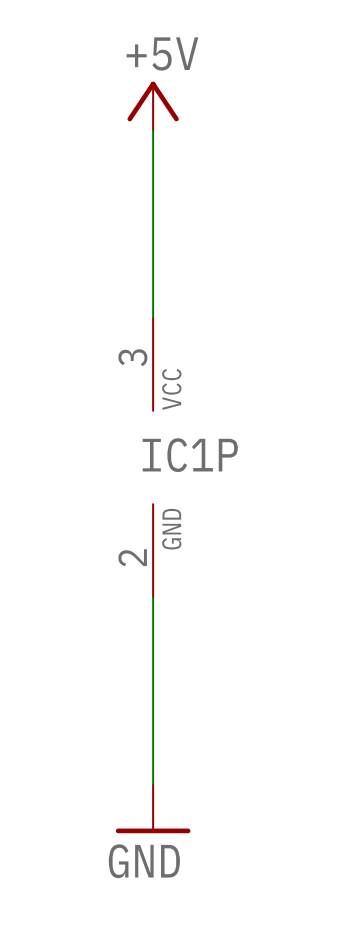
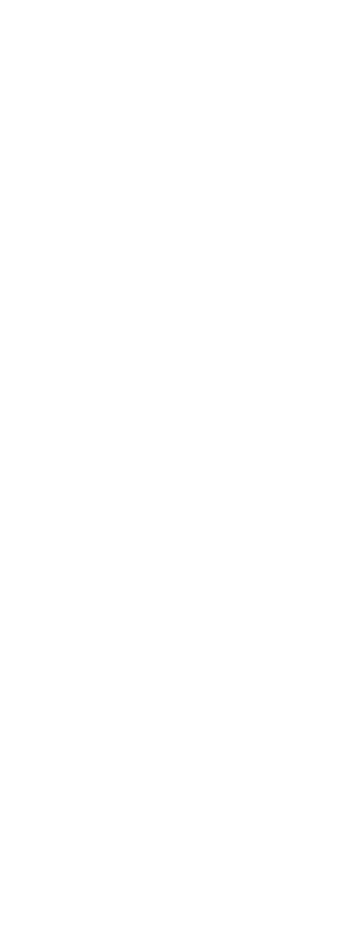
power symbol: +5V (153, 106) -> none
wire: (153, 130) (153, 317) -> none
IC1P: (153, 457) -> none
wire: (153, 597) (153, 784) -> none
power symbol: GND (153, 808) -> none

